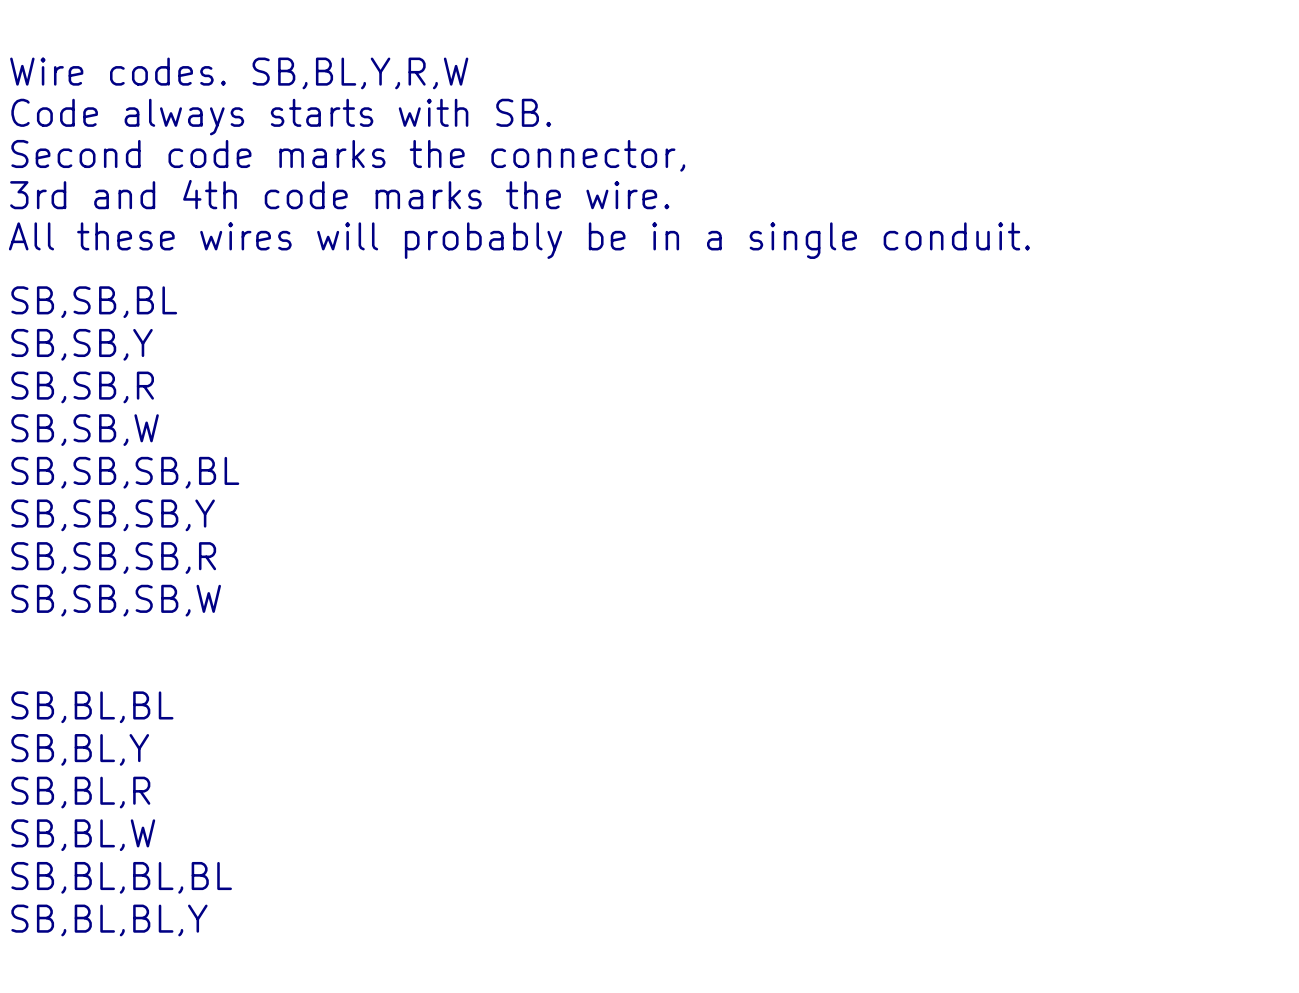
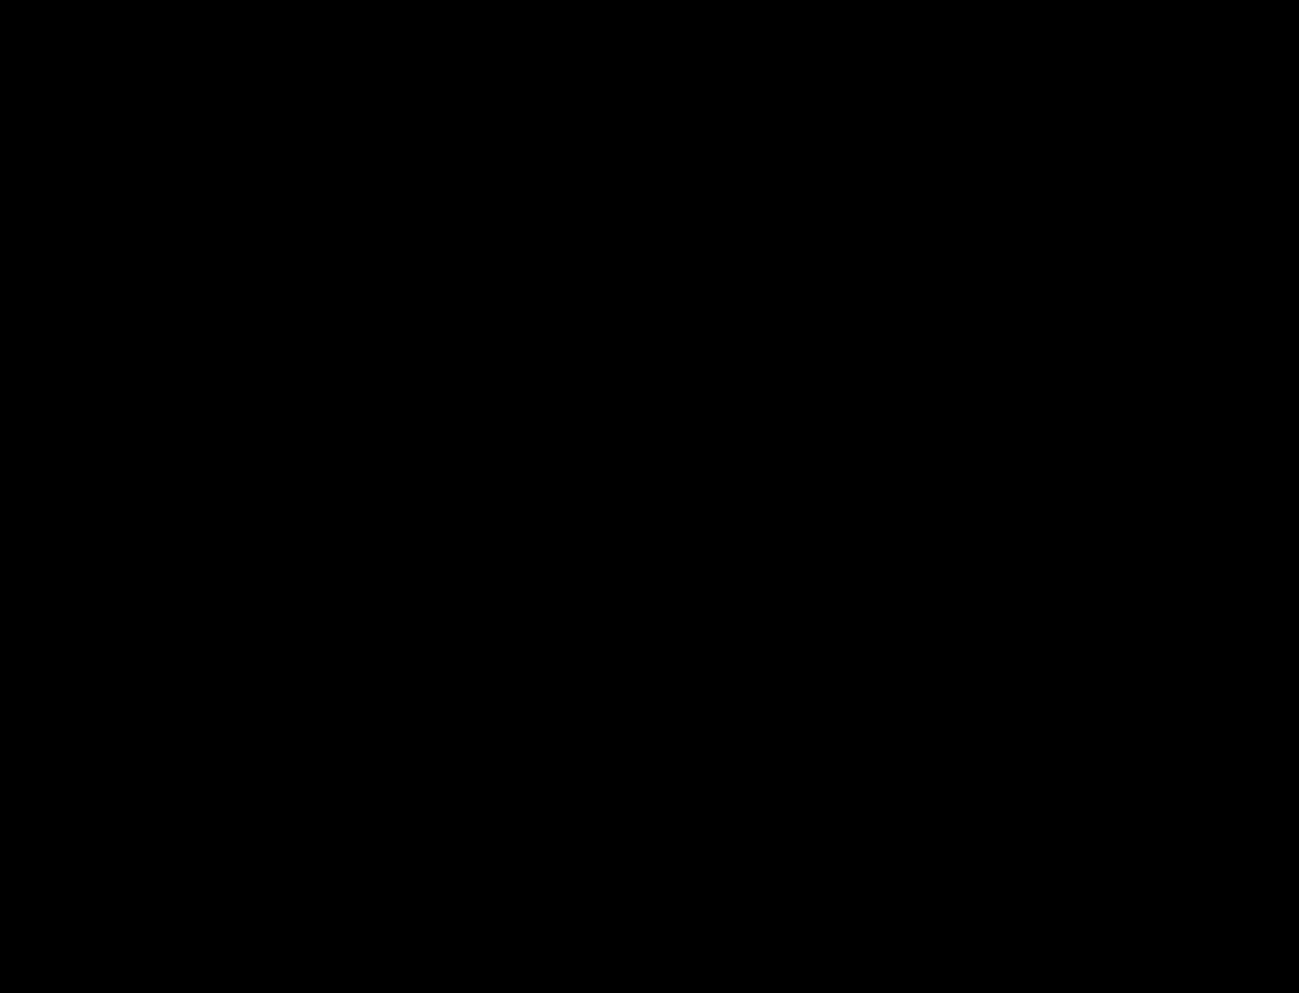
text: Wire codes. SB,BL,Y,R,W (239, 73) -> none
text: Code always starts with SB. (281, 117) -> none
text: Second code marks the connector, (348, 155) -> none
text: 3rd and 4th code marks the wire. (339, 194) -> none
text: All these wires will probably be in a single conduit. (519, 240) -> none
text: SB,SB,BL (94, 302) -> none
text: SB,SB,Y (82, 344) -> none
text: SB,SB,R (82, 387) -> none
text: SB,SB,W (85, 430) -> none
text: SB,SB,SB,BL (125, 472) -> none
text: SB,SB,SB,Y (113, 515) -> none
text: SB,SB,SB,R (113, 558) -> none
text: SB,SB,SB,W (116, 600) -> none
text: SB,BL,BL (92, 707) -> none
text: SB,BL,Y (80, 749) -> none
text: SB,BL,R (80, 792) -> none
text: SB,BL,W (83, 835) -> none
text: SB,BL,BL,BL (121, 877) -> none
text: SB,BL,BL,Y (109, 920) -> none

